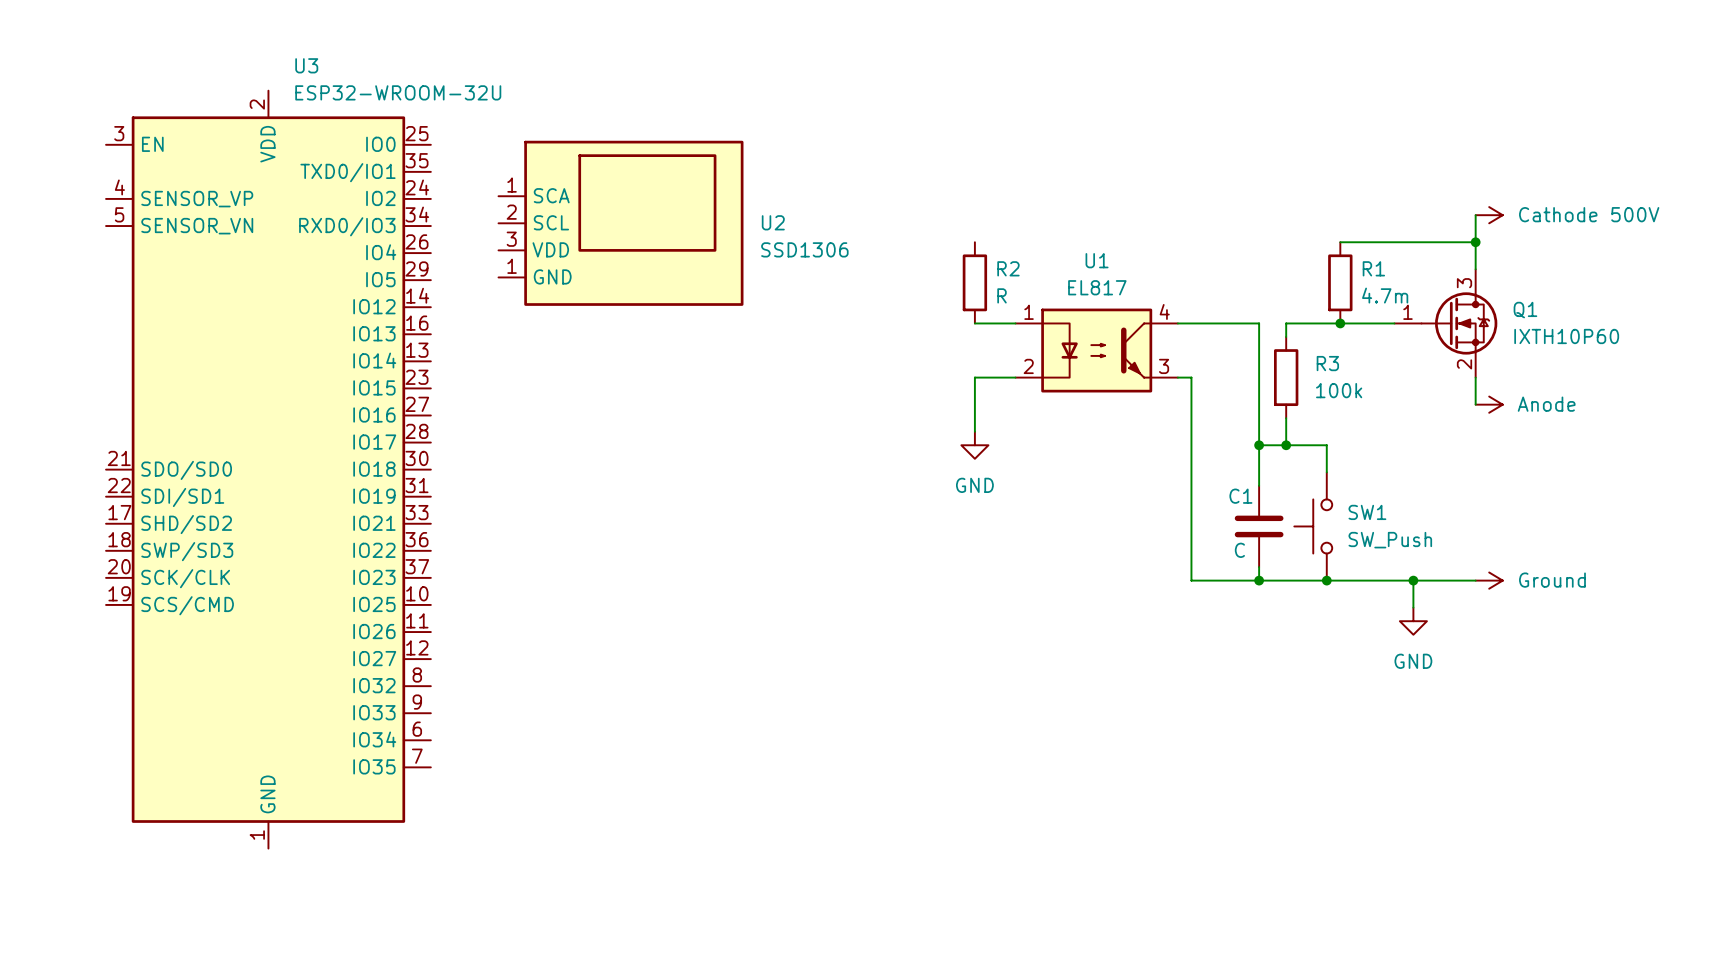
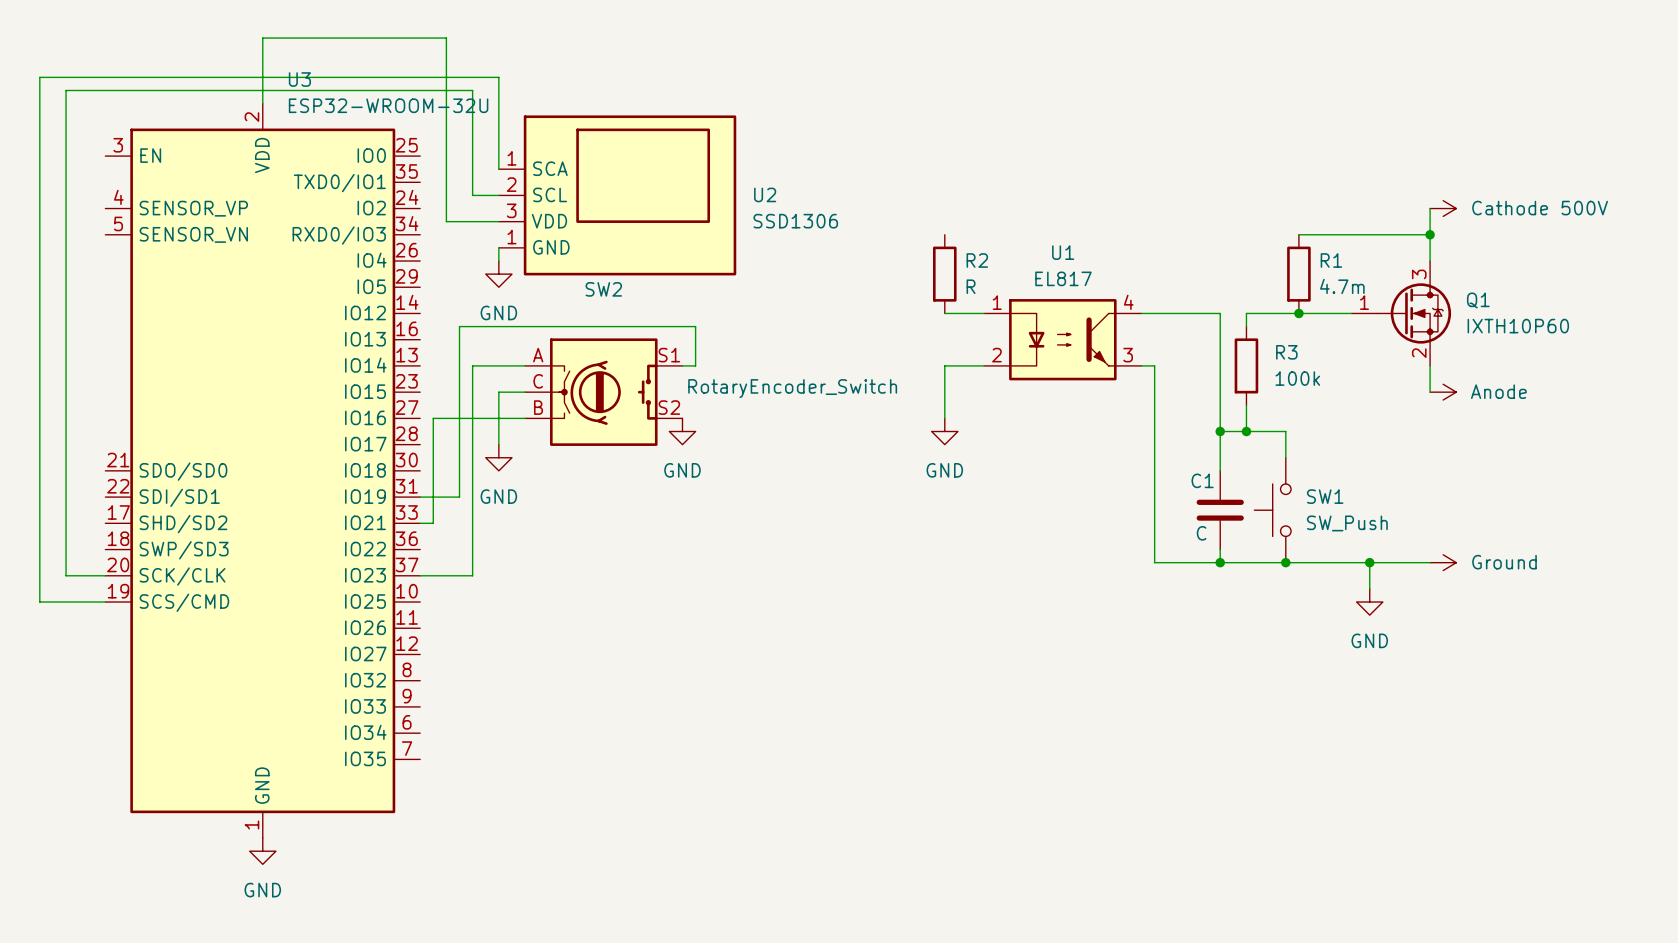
wire: none -> (262, 103) (262, 38) (446, 38) (446, 221) (498, 221)
wire: none -> (498, 169) (498, 77) (39, 77) (39, 602) (105, 602)
wire: none -> (498, 195) (472, 195) (472, 90) (66, 90) (66, 575) (105, 575)
U2 position: (621, 223) -> (617, 195)
wire: none -> (498, 247) (498, 261)
power symbol: none -> GND (498, 274)
wire: none -> (525, 365) (472, 365) (472, 575) (420, 575)
wire: none -> (682, 365) (695, 365) (695, 326) (459, 326) (459, 497) (420, 497)
wire: none -> (525, 392) (498, 392) (498, 444)
SW2: none -> RotaryEncoder_Switch (603, 392)
wire: none -> (525, 418) (433, 418) (433, 523) (420, 523)
power symbol: none -> GND (682, 431)
U3 position: (268, 469) -> (262, 470)
power symbol: none -> GND (498, 457)
power symbol: none -> GND (262, 851)

